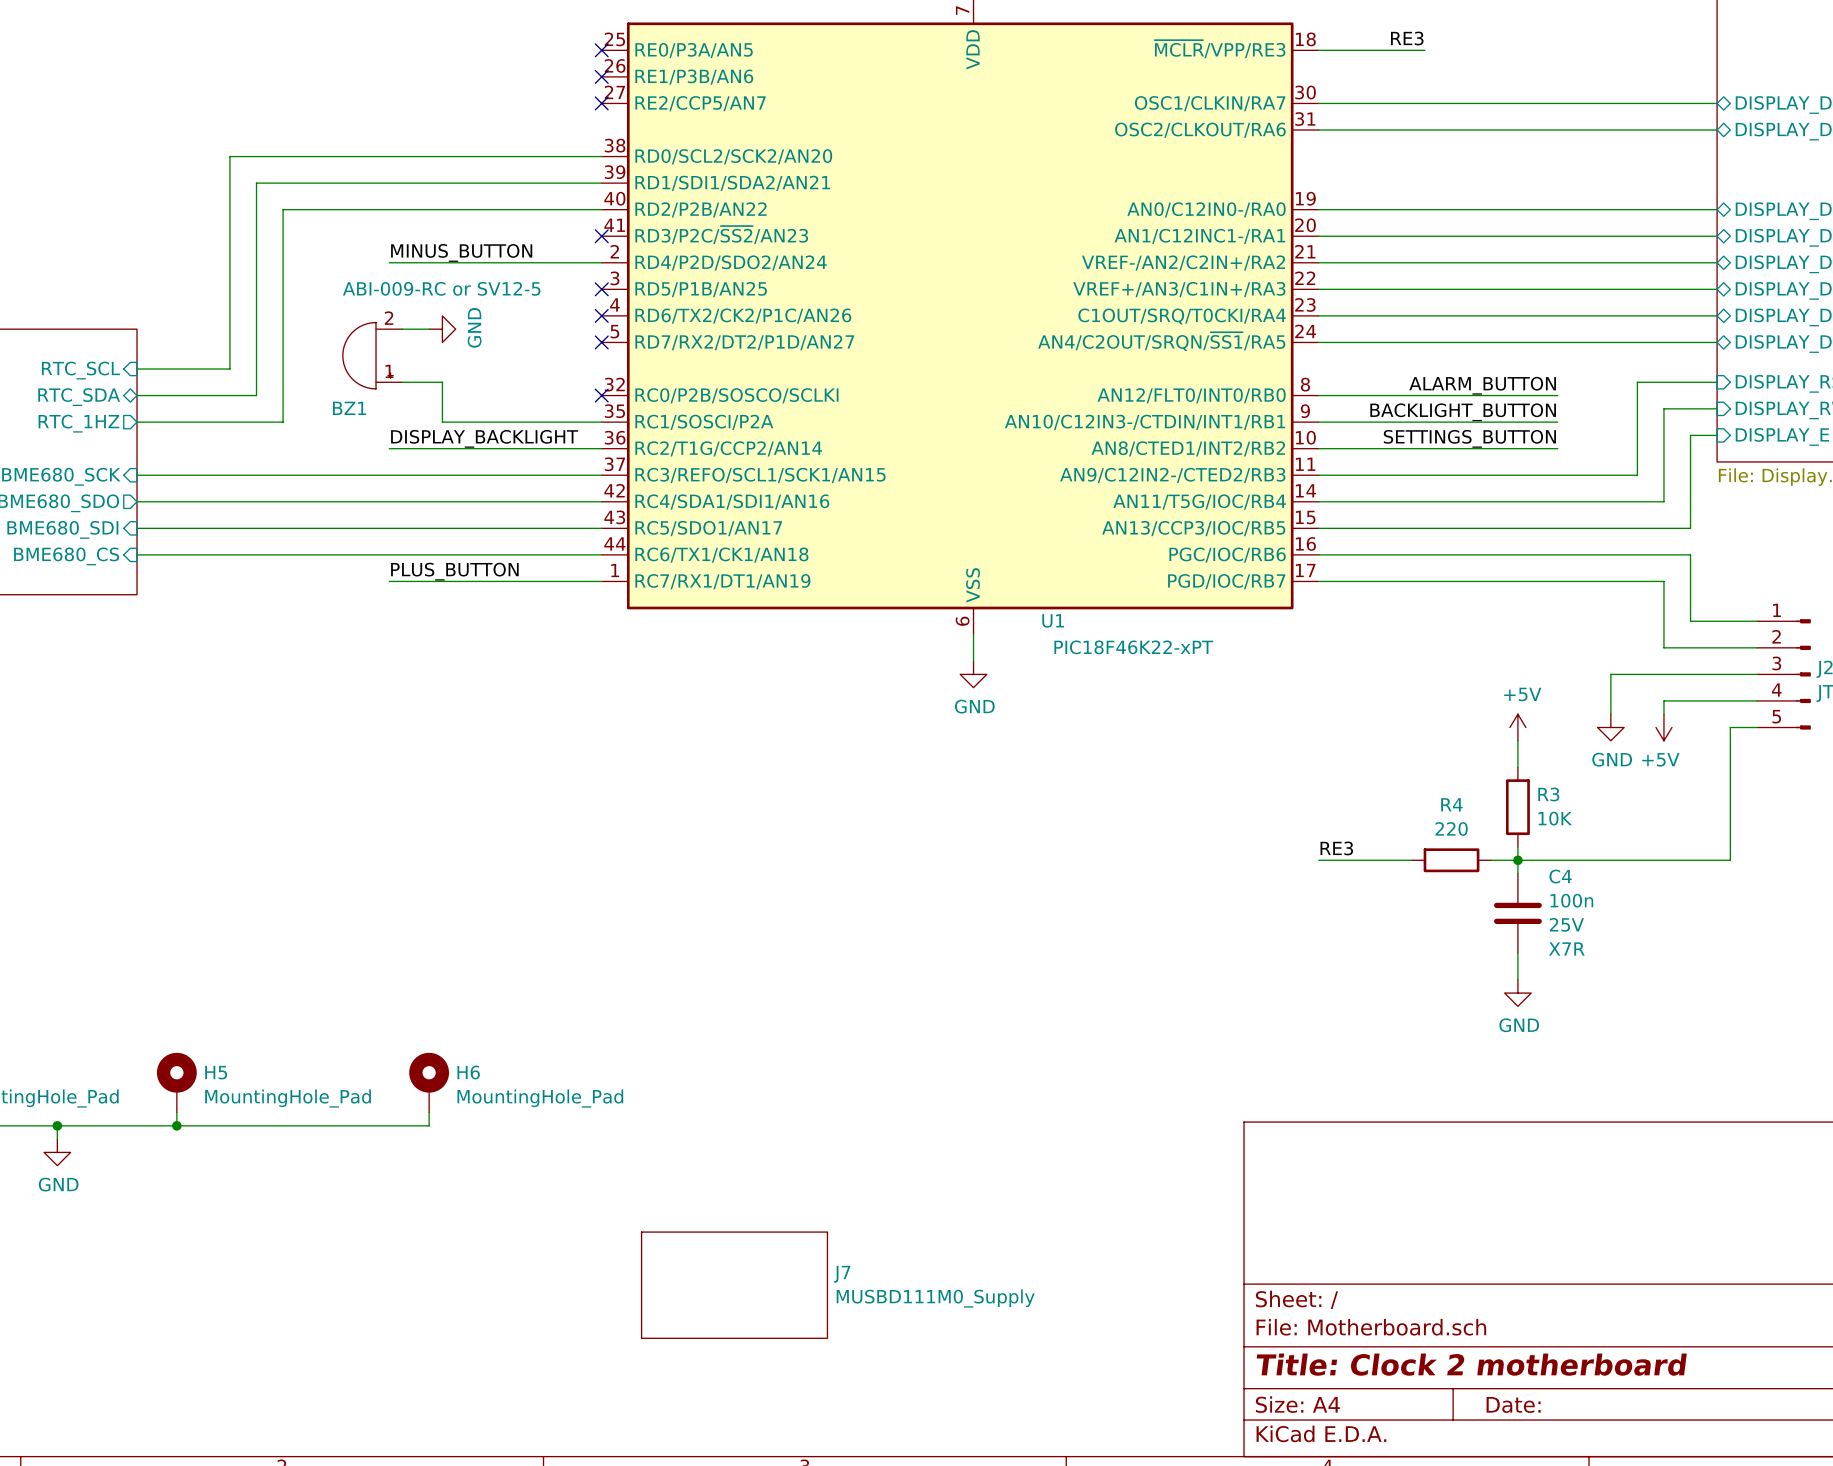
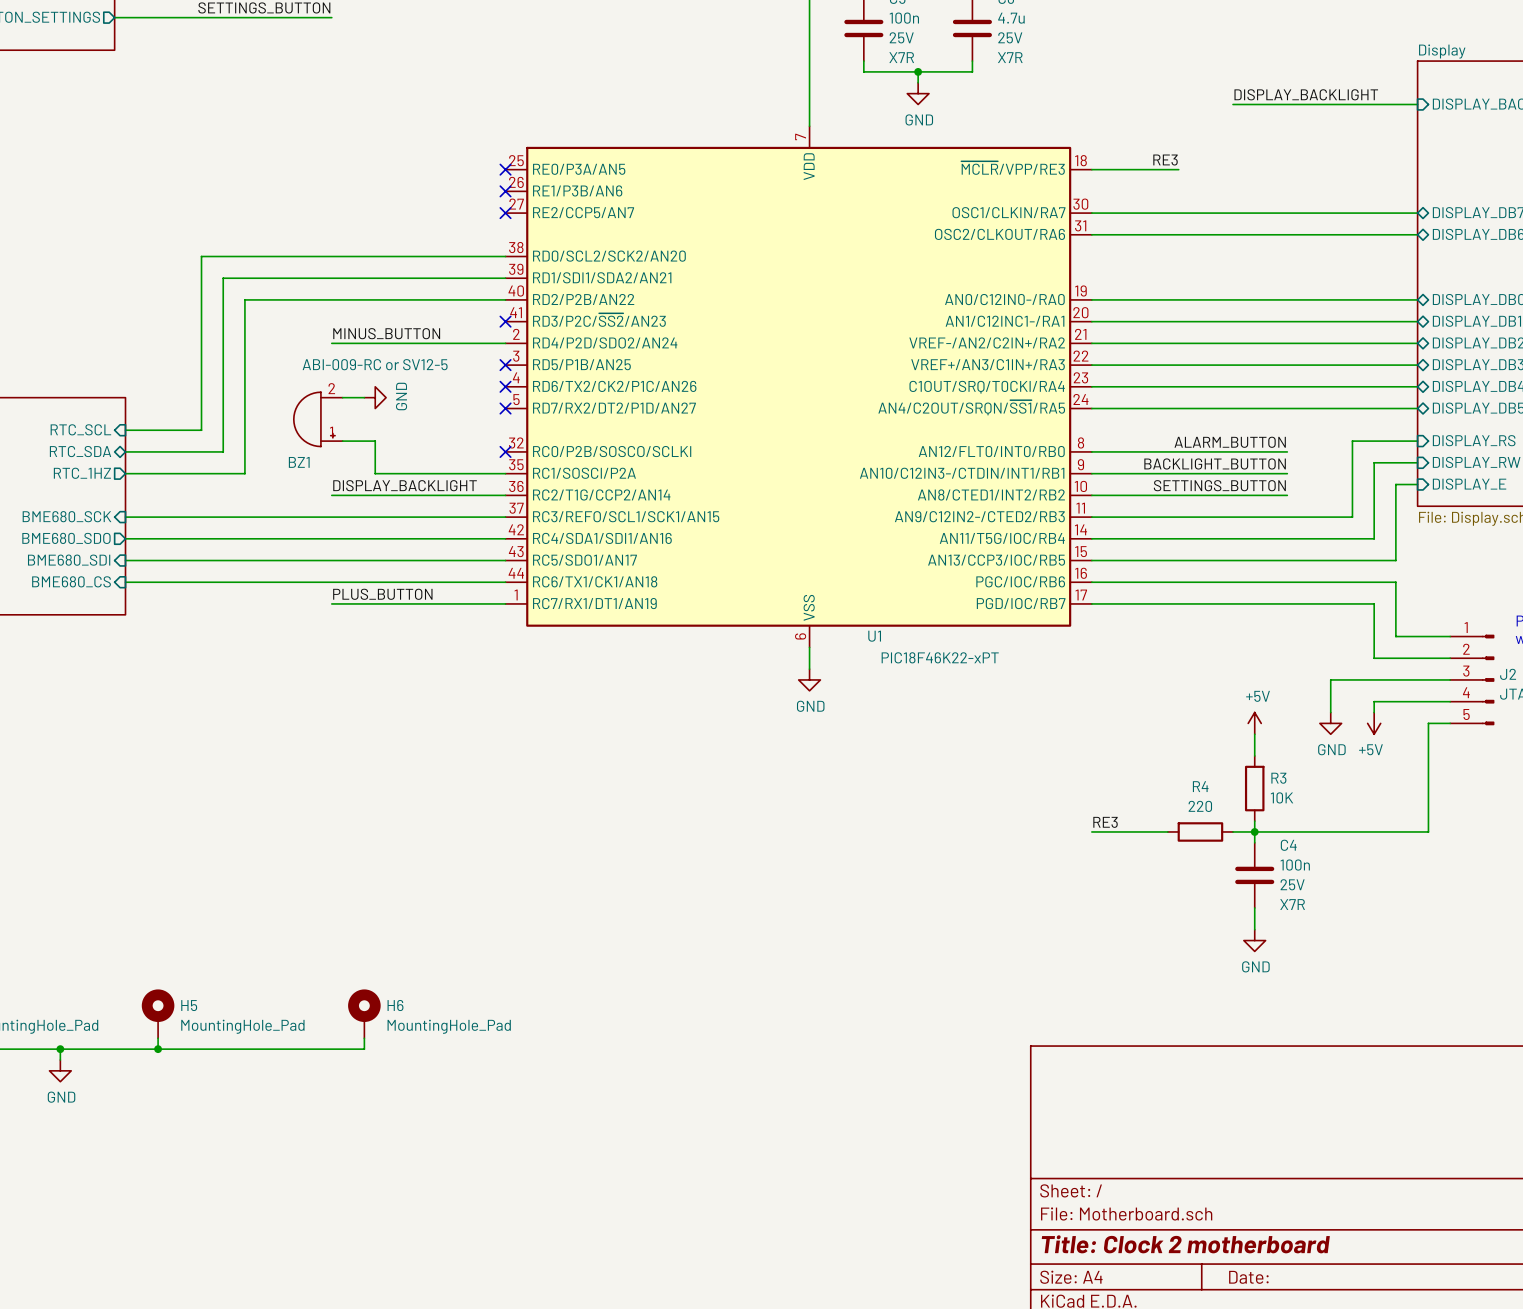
J7: MUSBD111M0_Supply (734, 1285) -> none

